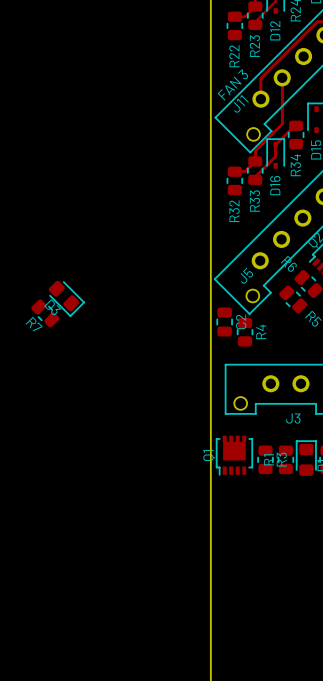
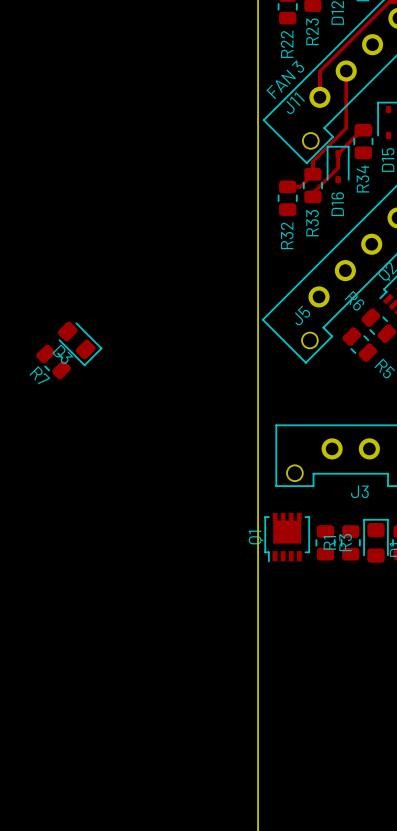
C2: (224, 321) -> none
R4: (245, 332) -> none

